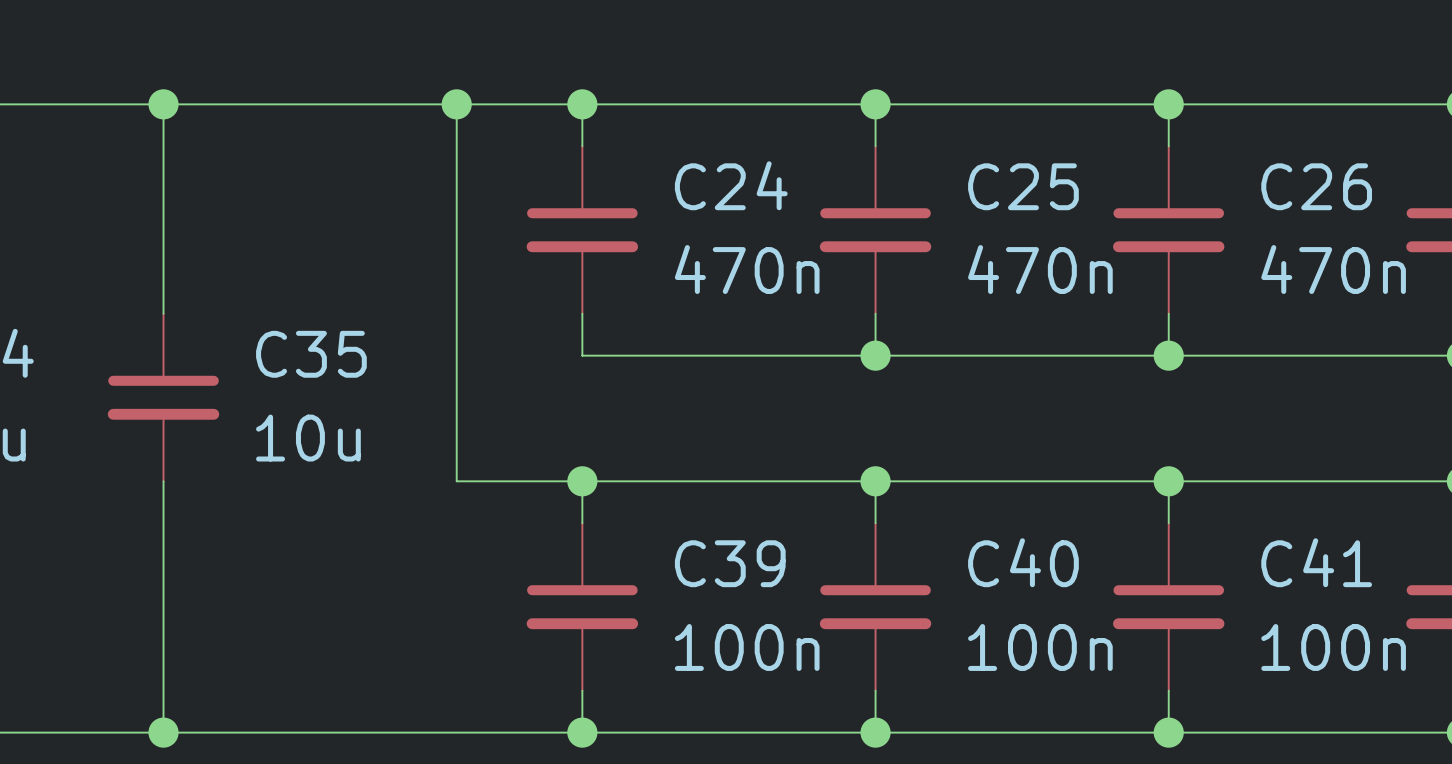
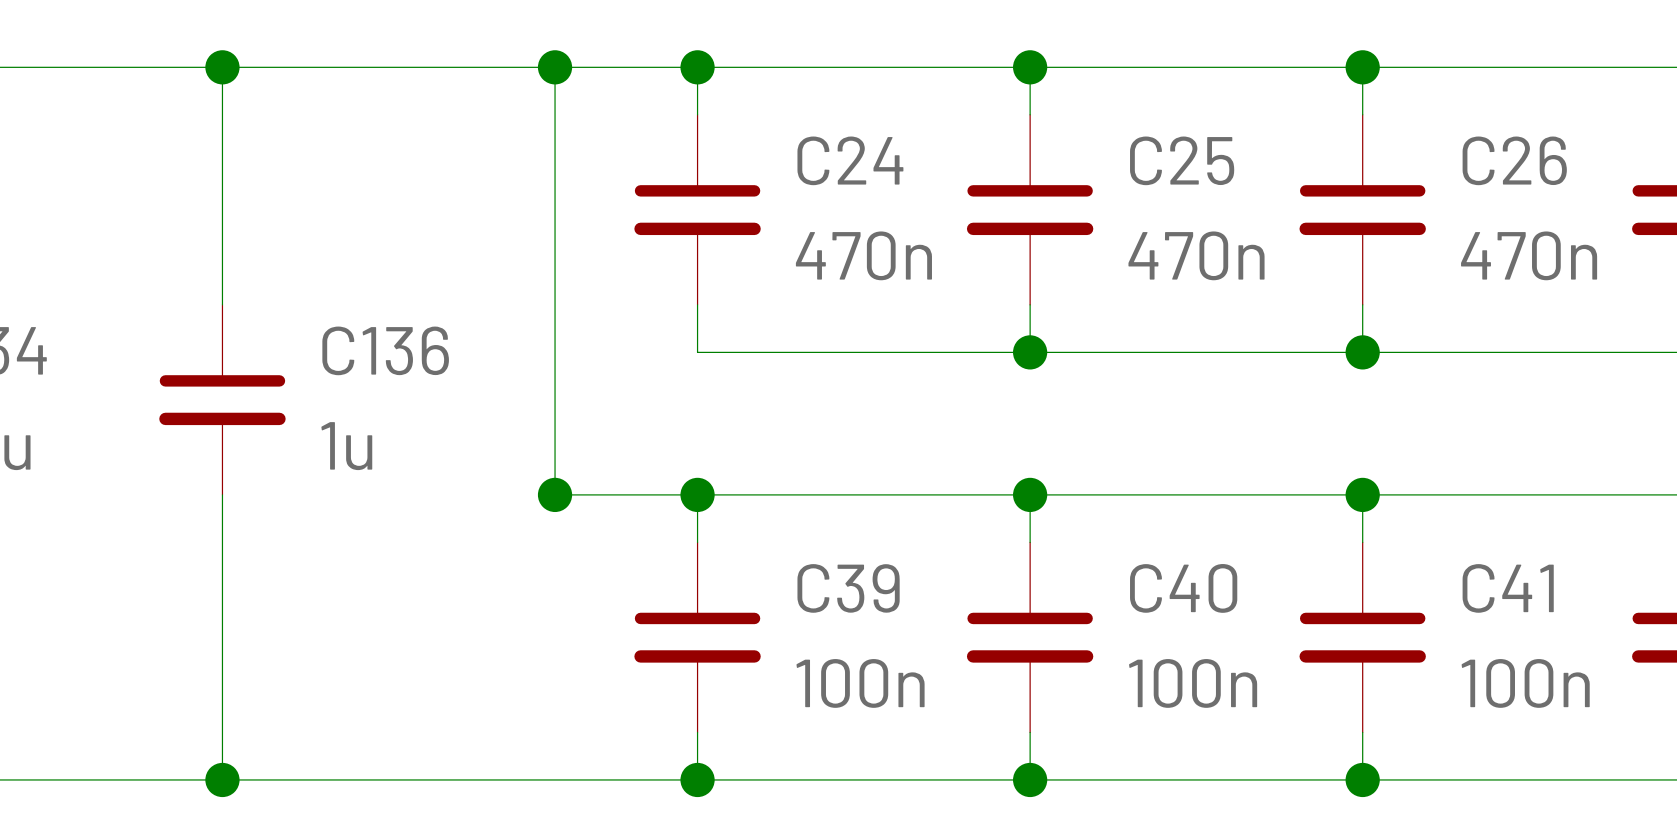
C35 name: C35 (311, 354) -> C136 (385, 350)
C35 value: 10u (308, 438) -> 1u (346, 446)
junction: none -> (555, 494)

